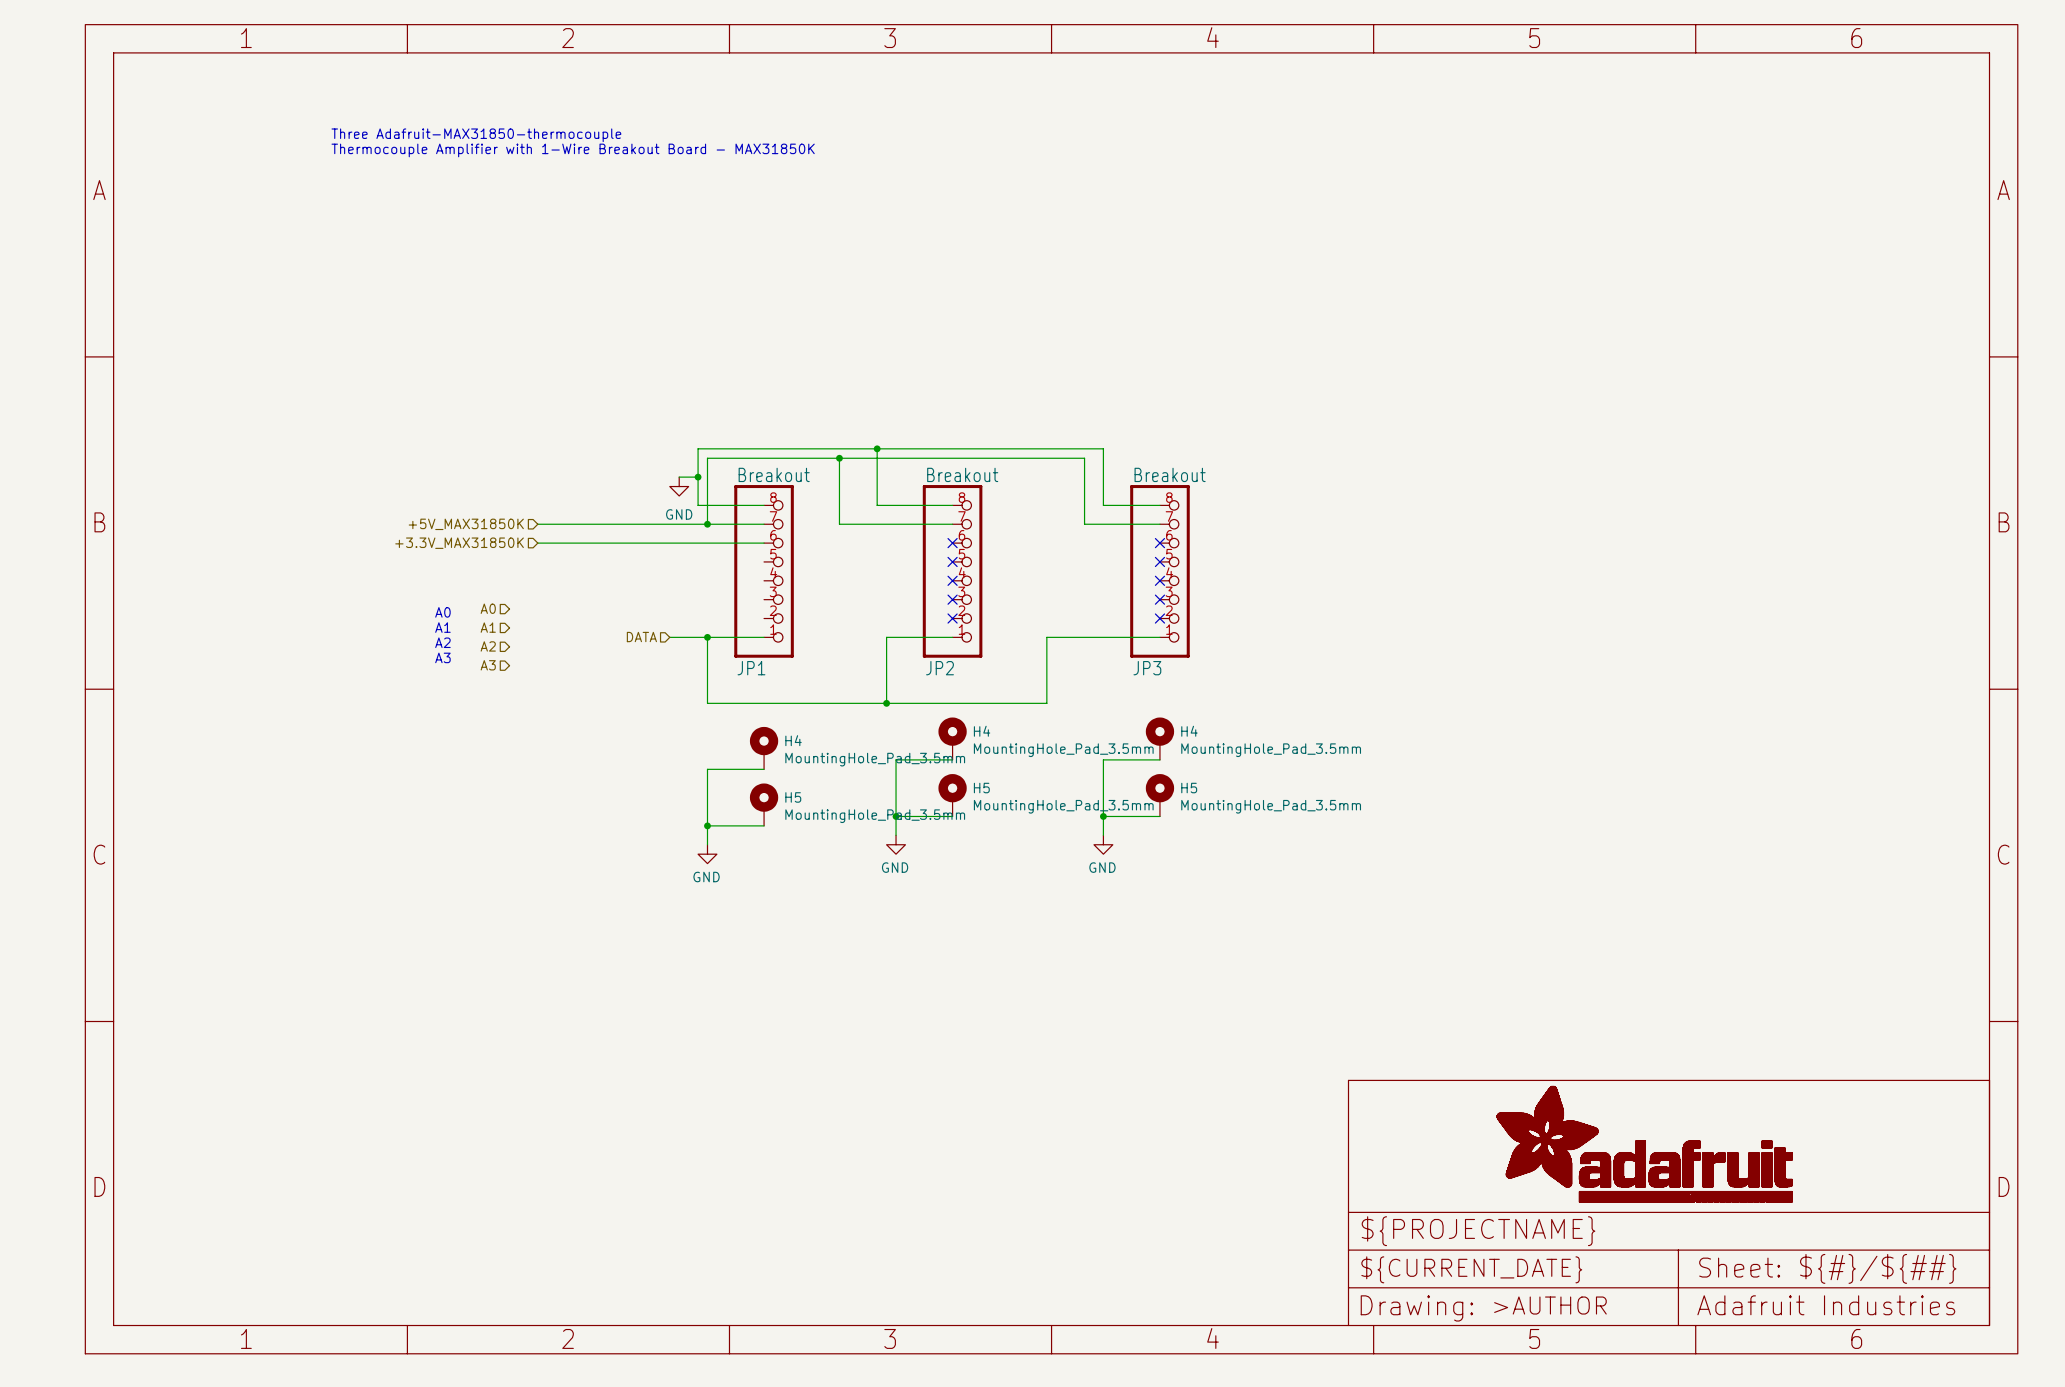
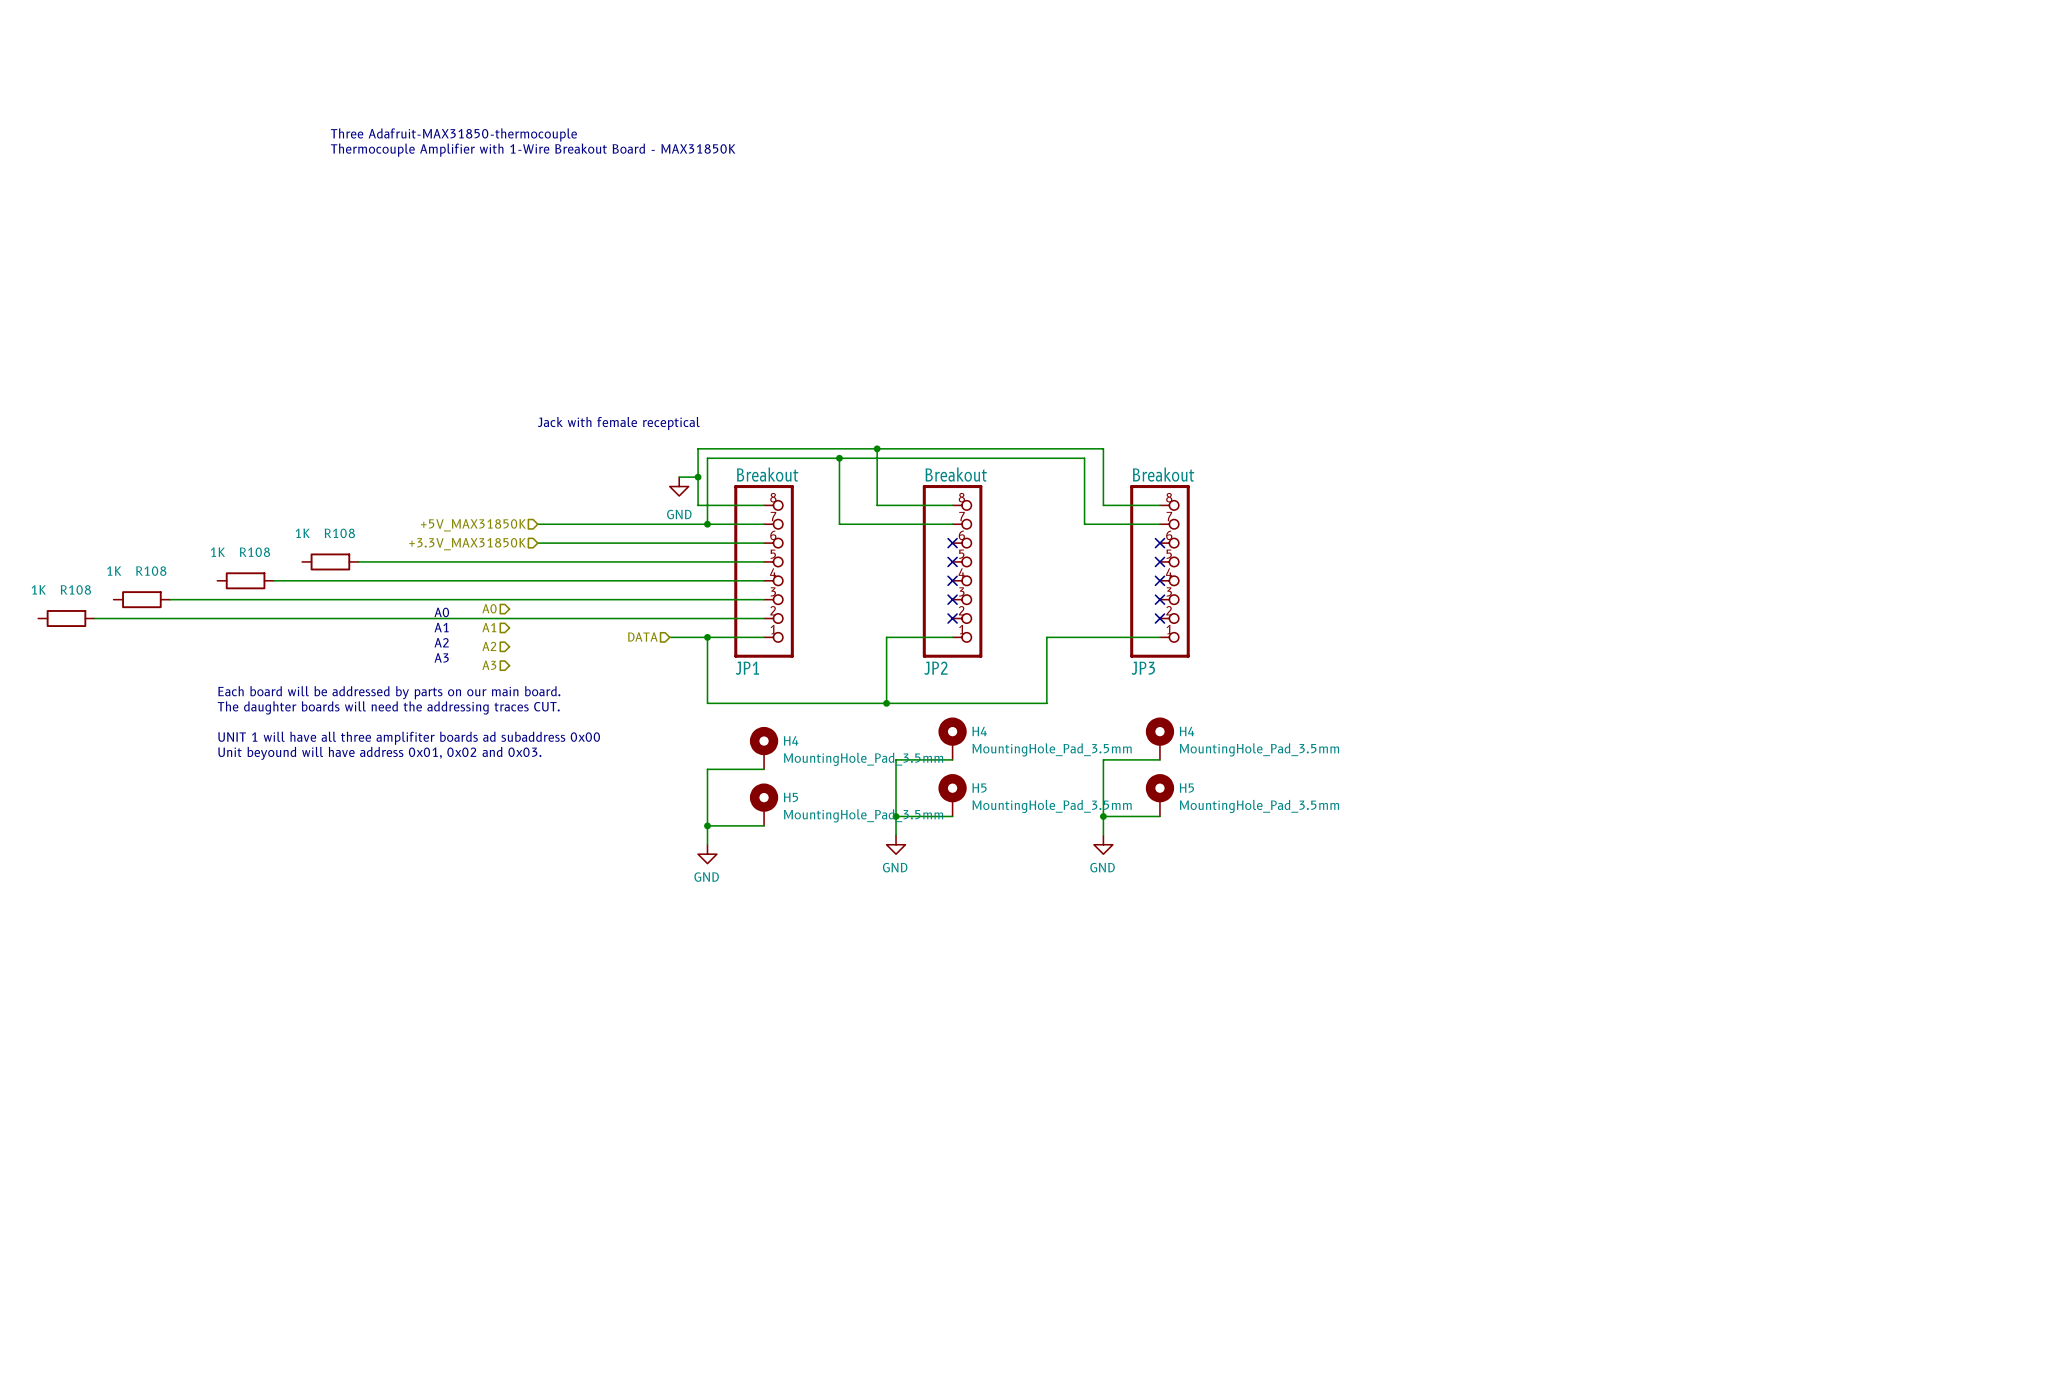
text: none -> Jack with female receptical (618, 423)
R108: none -> 1K (330, 561)
wire: none -> (358, 561) (764, 561)
R108: none -> 1K (245, 580)
wire: none -> (273, 580) (764, 580)
R108: none -> 1K (141, 599)
wire: none -> (170, 599) (764, 599)
R108: none -> 1K (66, 618)
wire: none -> (94, 618) (764, 618)
power symbol: (1051, 689) -> none
text: none -> Each board will be addressed by parts on our main board. (389, 692)
text: none -> The daughter boards will need the addressing traces CUT. (388, 707)
text: none -> UNIT 1 will have all three amplifiter boards ad subaddress 0x00 (409, 738)
text: none -> Unit beyound will have address 0x01, 0x02 and 0x03. (379, 753)

